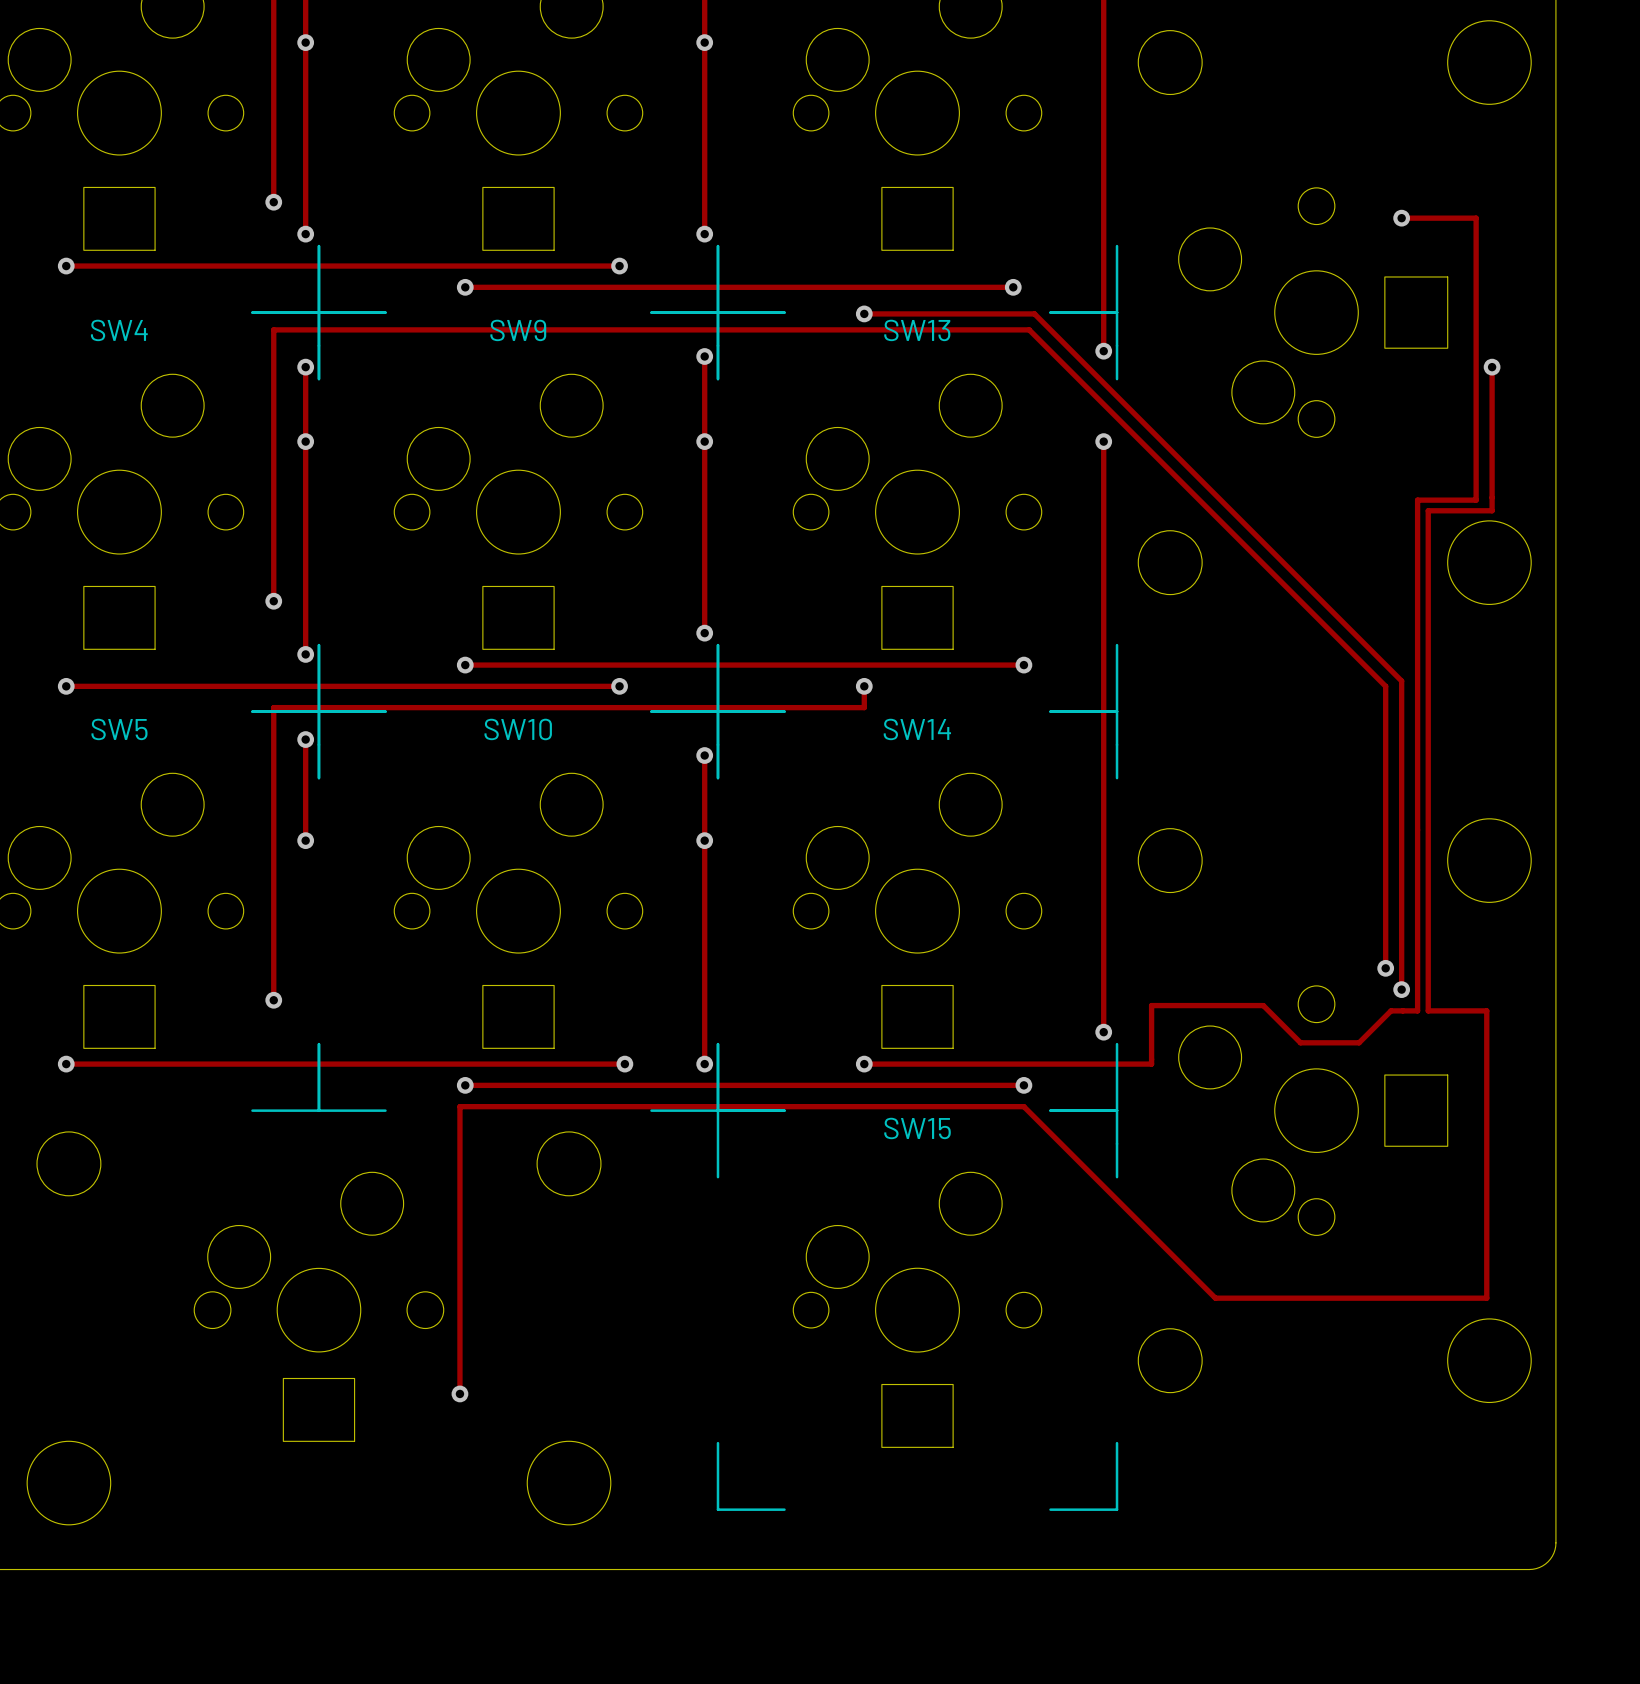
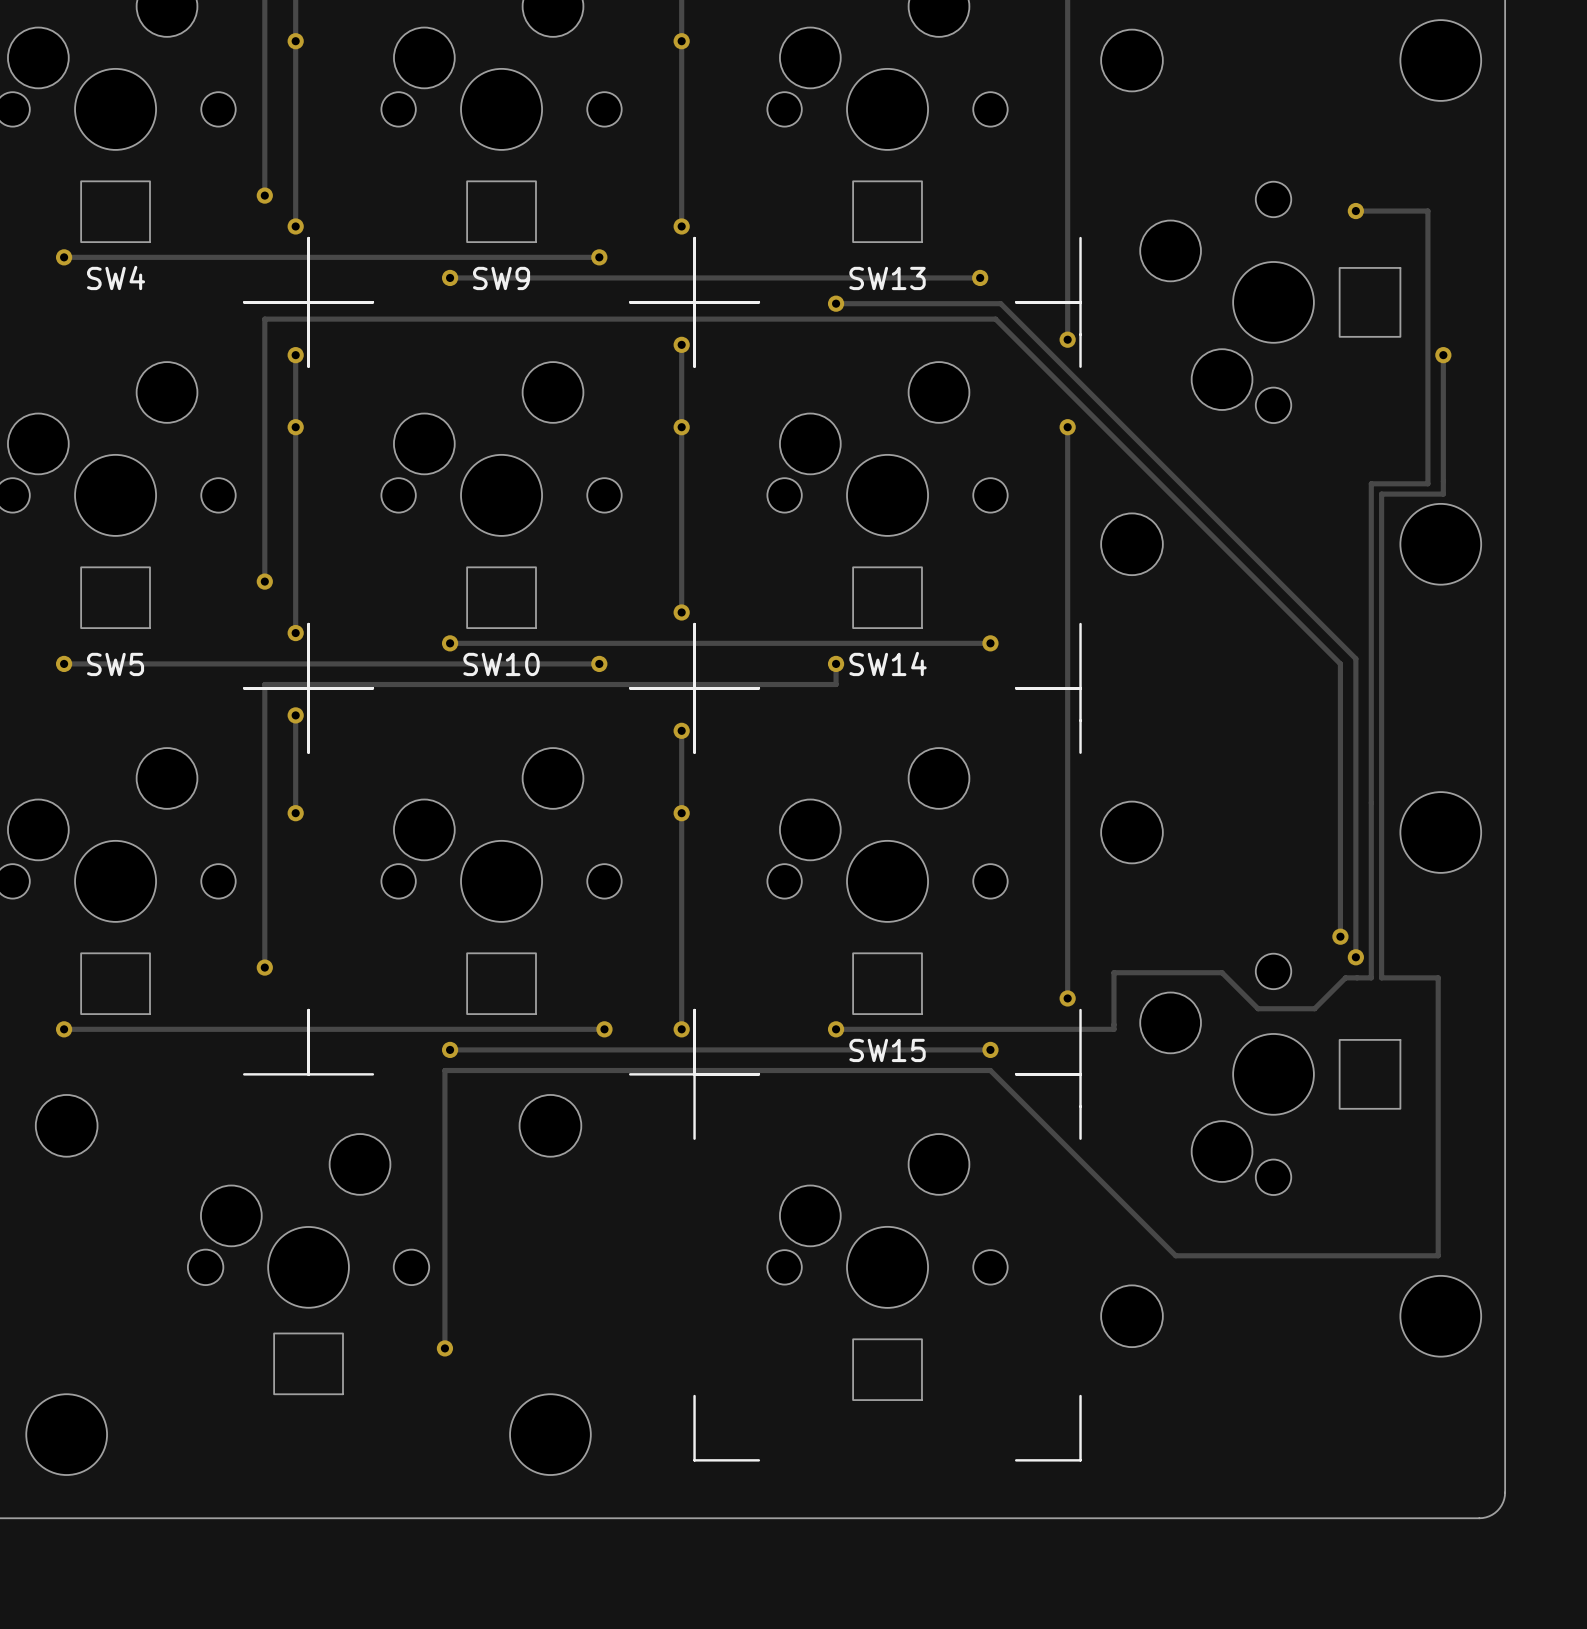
SW4 name position: SW4 (119, 330) -> SW4 (116, 277)
SW9 name position: SW9 (518, 330) -> SW9 (501, 278)
SW13 name position: SW13 (917, 330) -> SW13 (887, 278)
SW5 name position: SW5 (119, 729) -> SW5 (115, 664)
SW10 name position: SW10 (518, 729) -> SW10 (501, 664)
SW14 name position: SW14 (917, 729) -> SW14 (888, 663)
SW15 name position: SW15 (917, 1128) -> SW15 (887, 1050)

